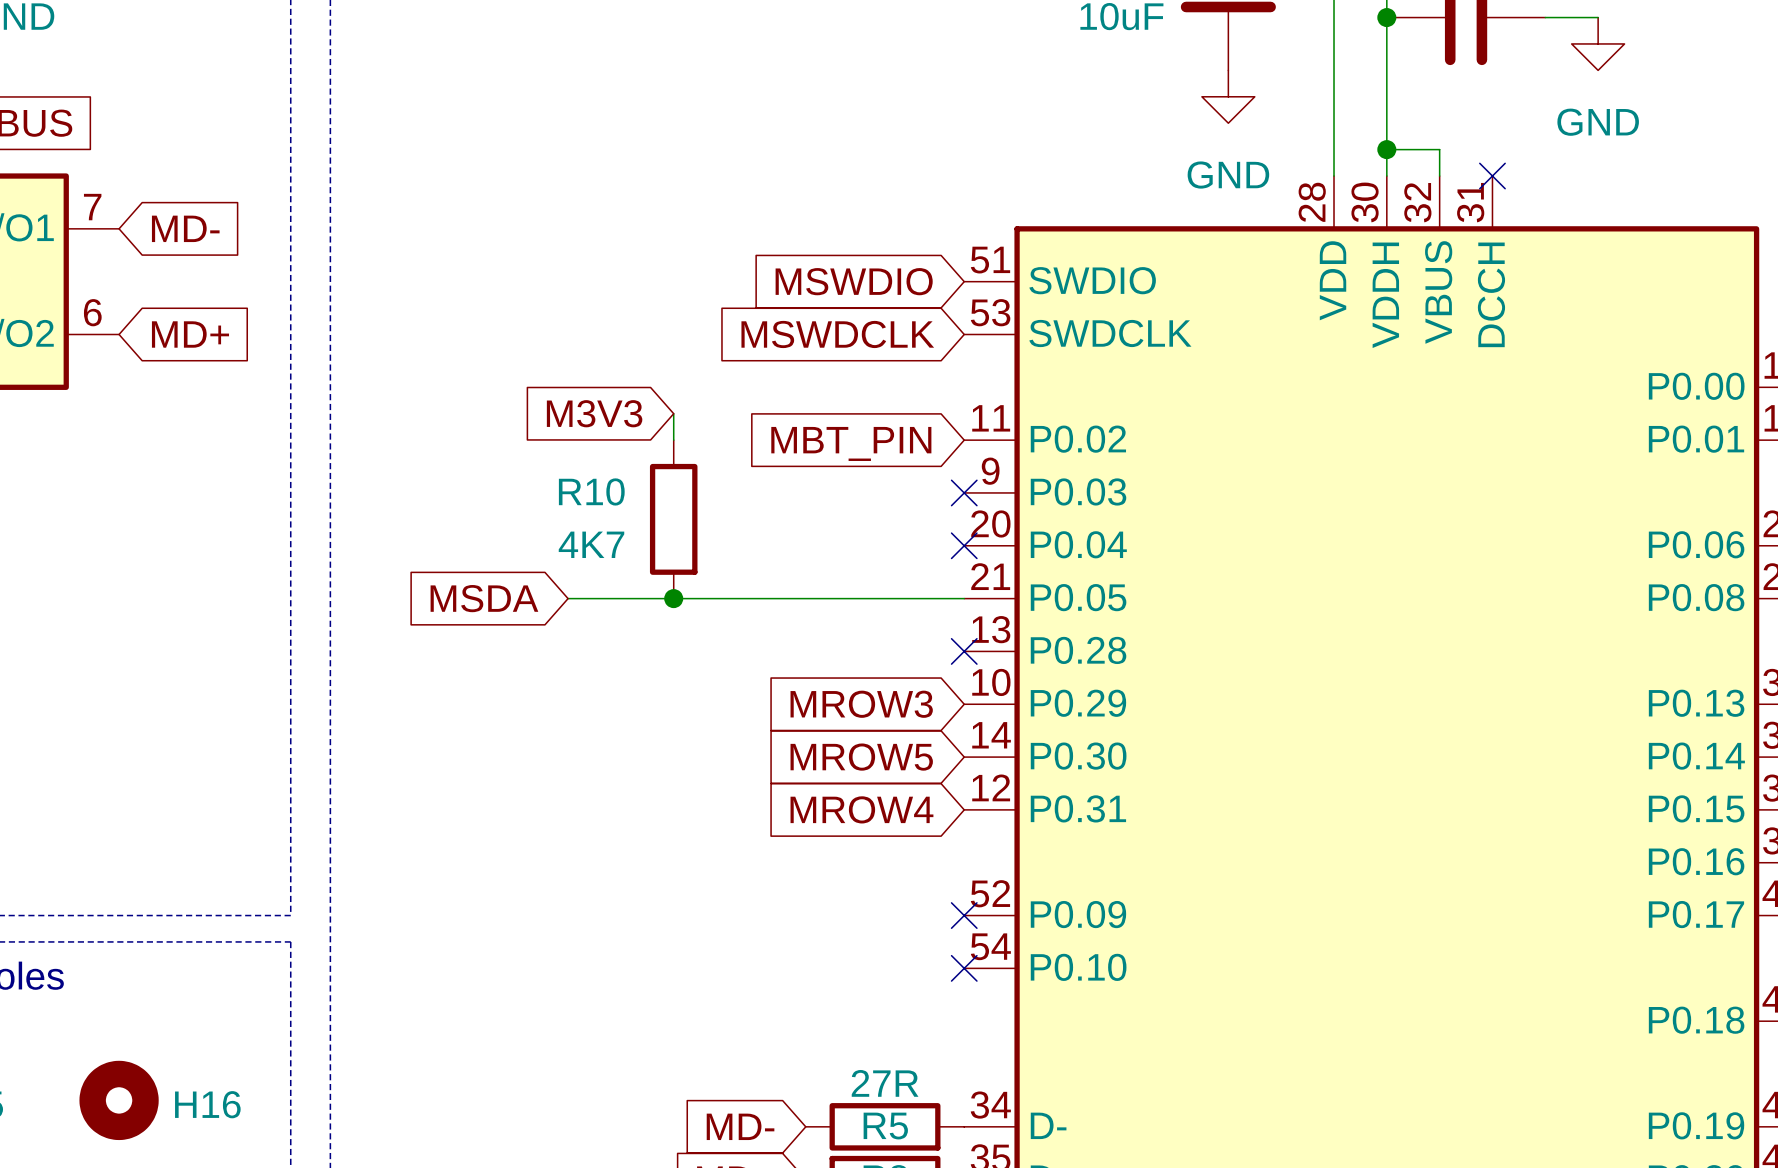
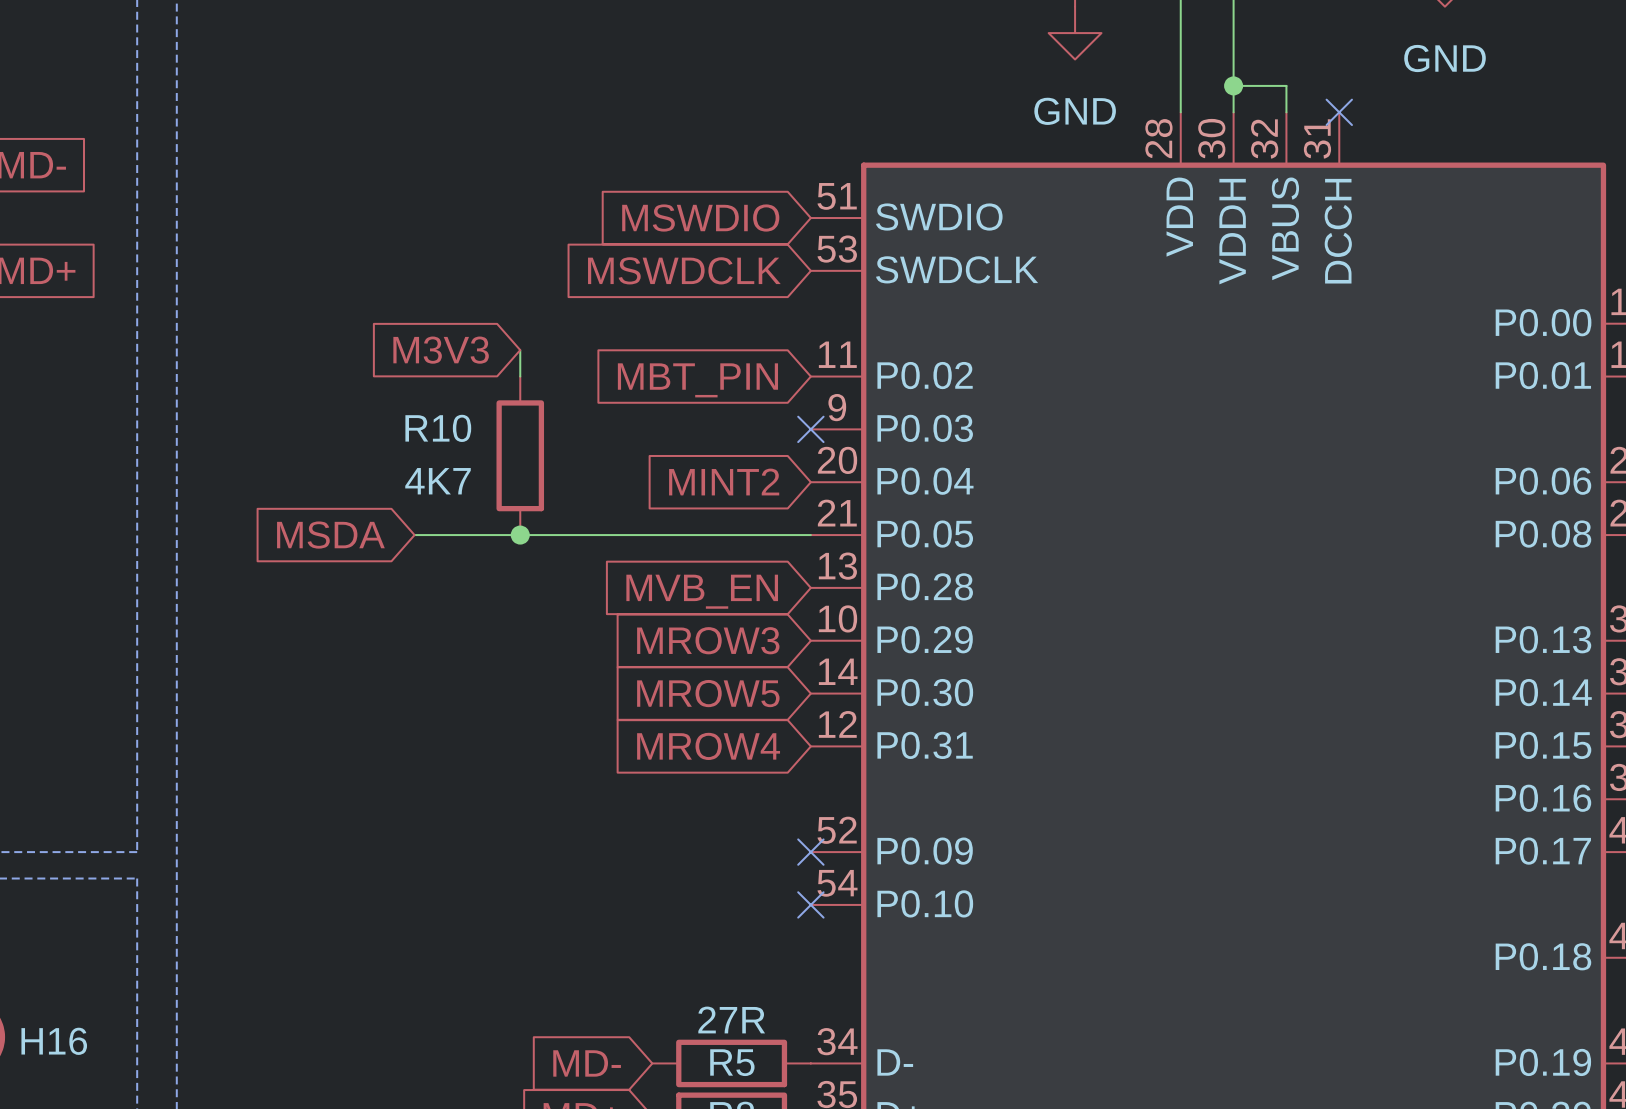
global label: none -> MINT2 (724, 482)
no-connect mark: (964, 545) -> none
no-connect mark: (964, 651) -> none
global label: none -> MVB_EN (702, 591)

